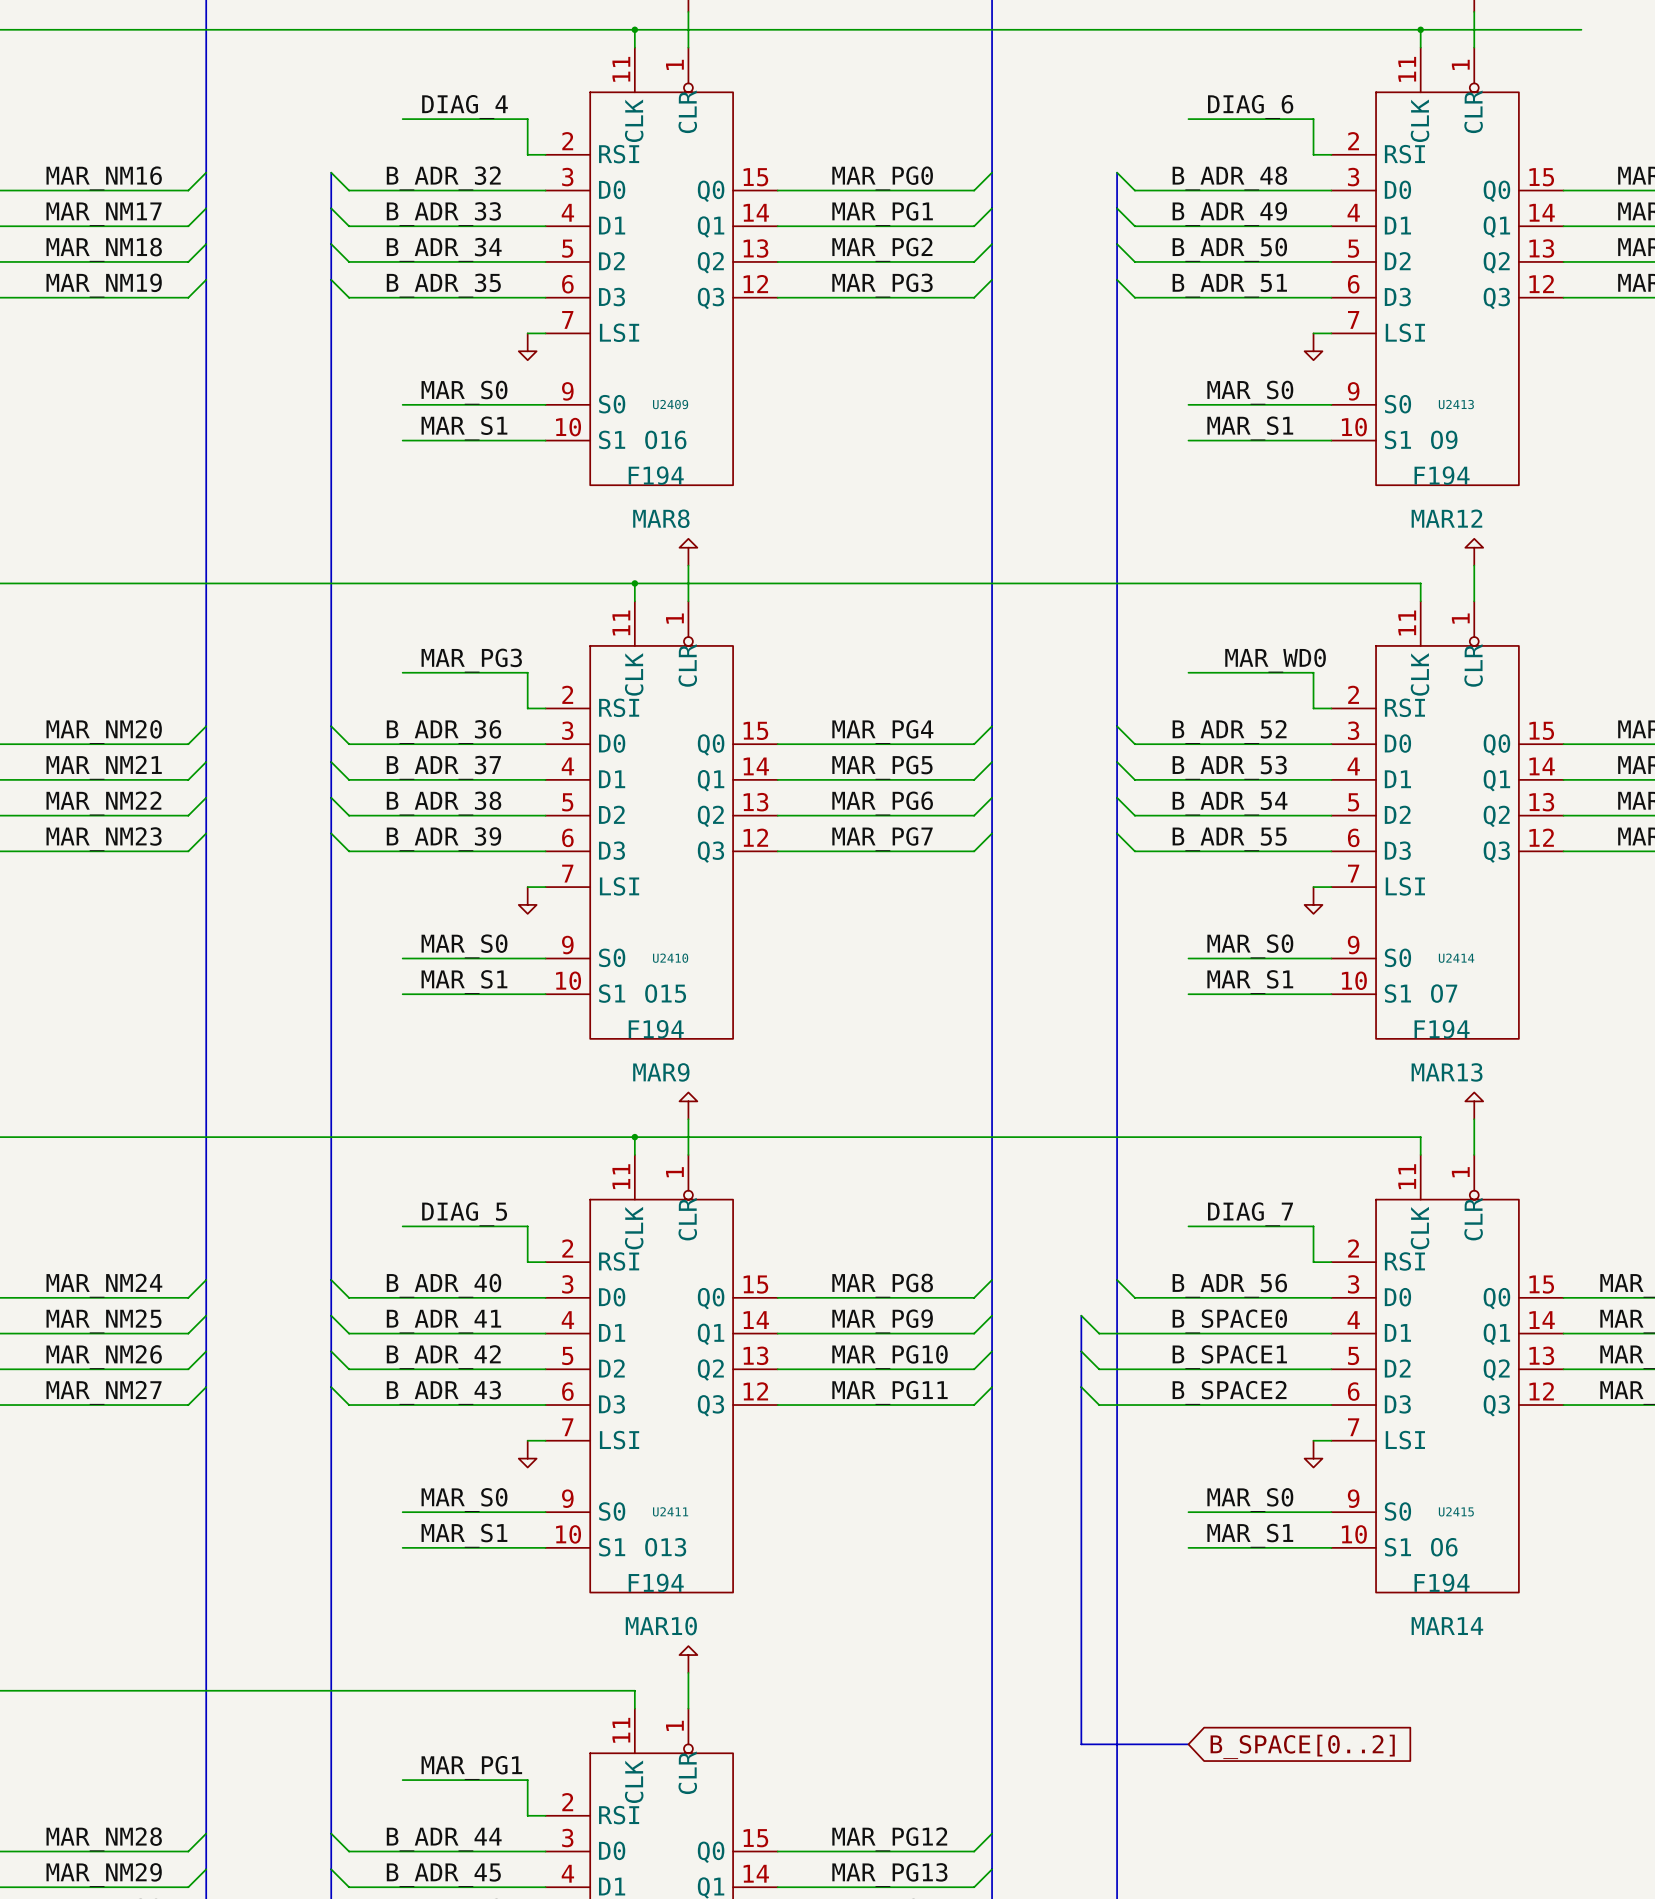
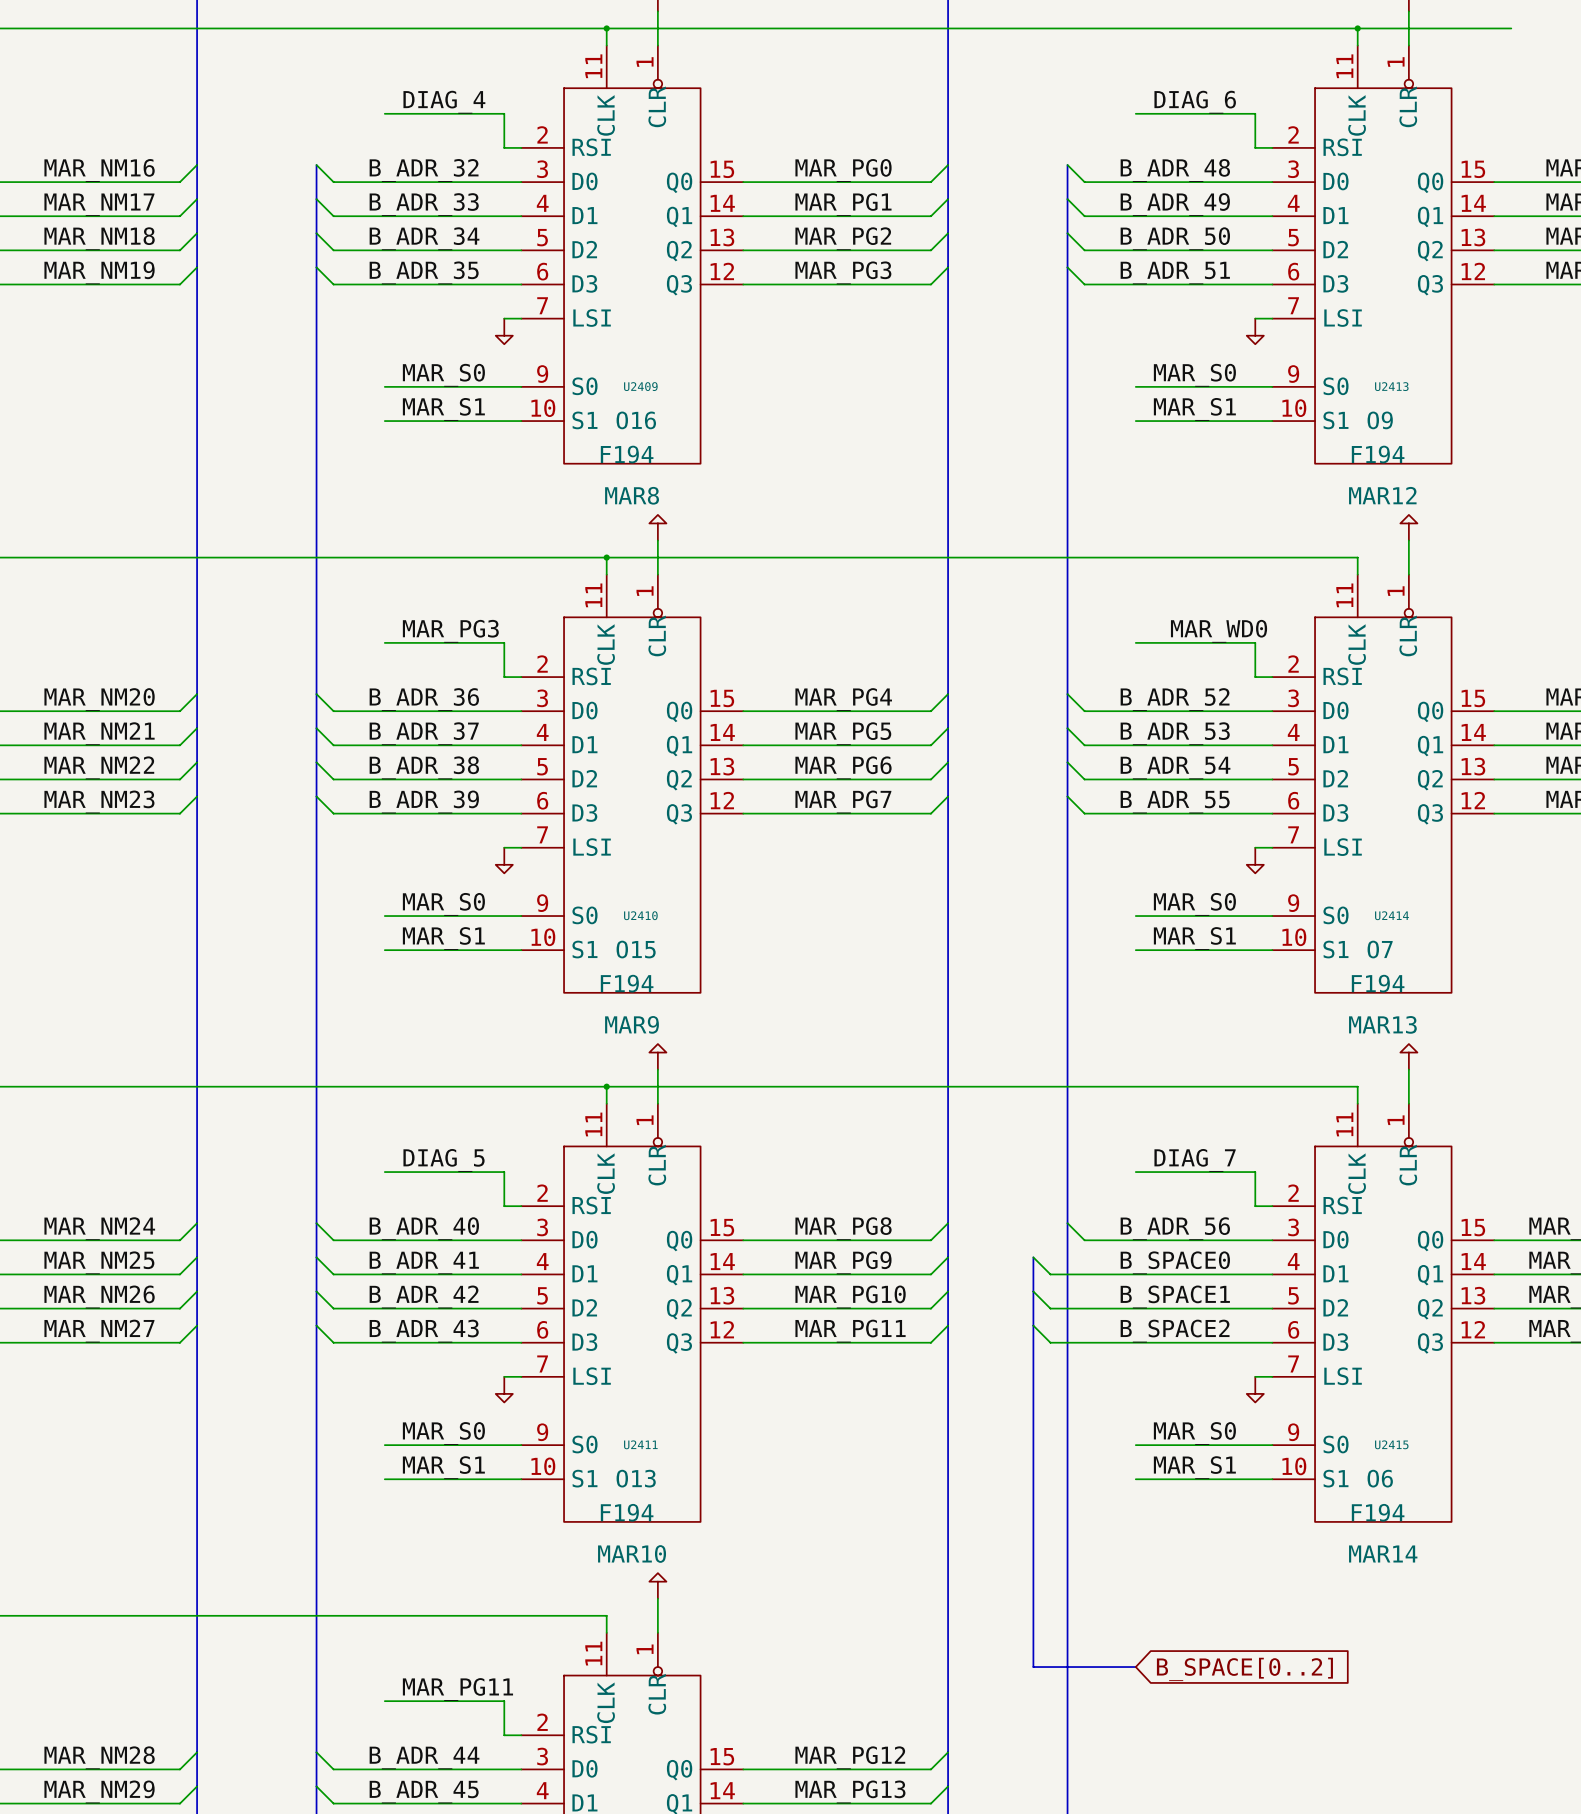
label: MAR_PG1 (471, 1767) -> MAR_PG11 (457, 1689)

